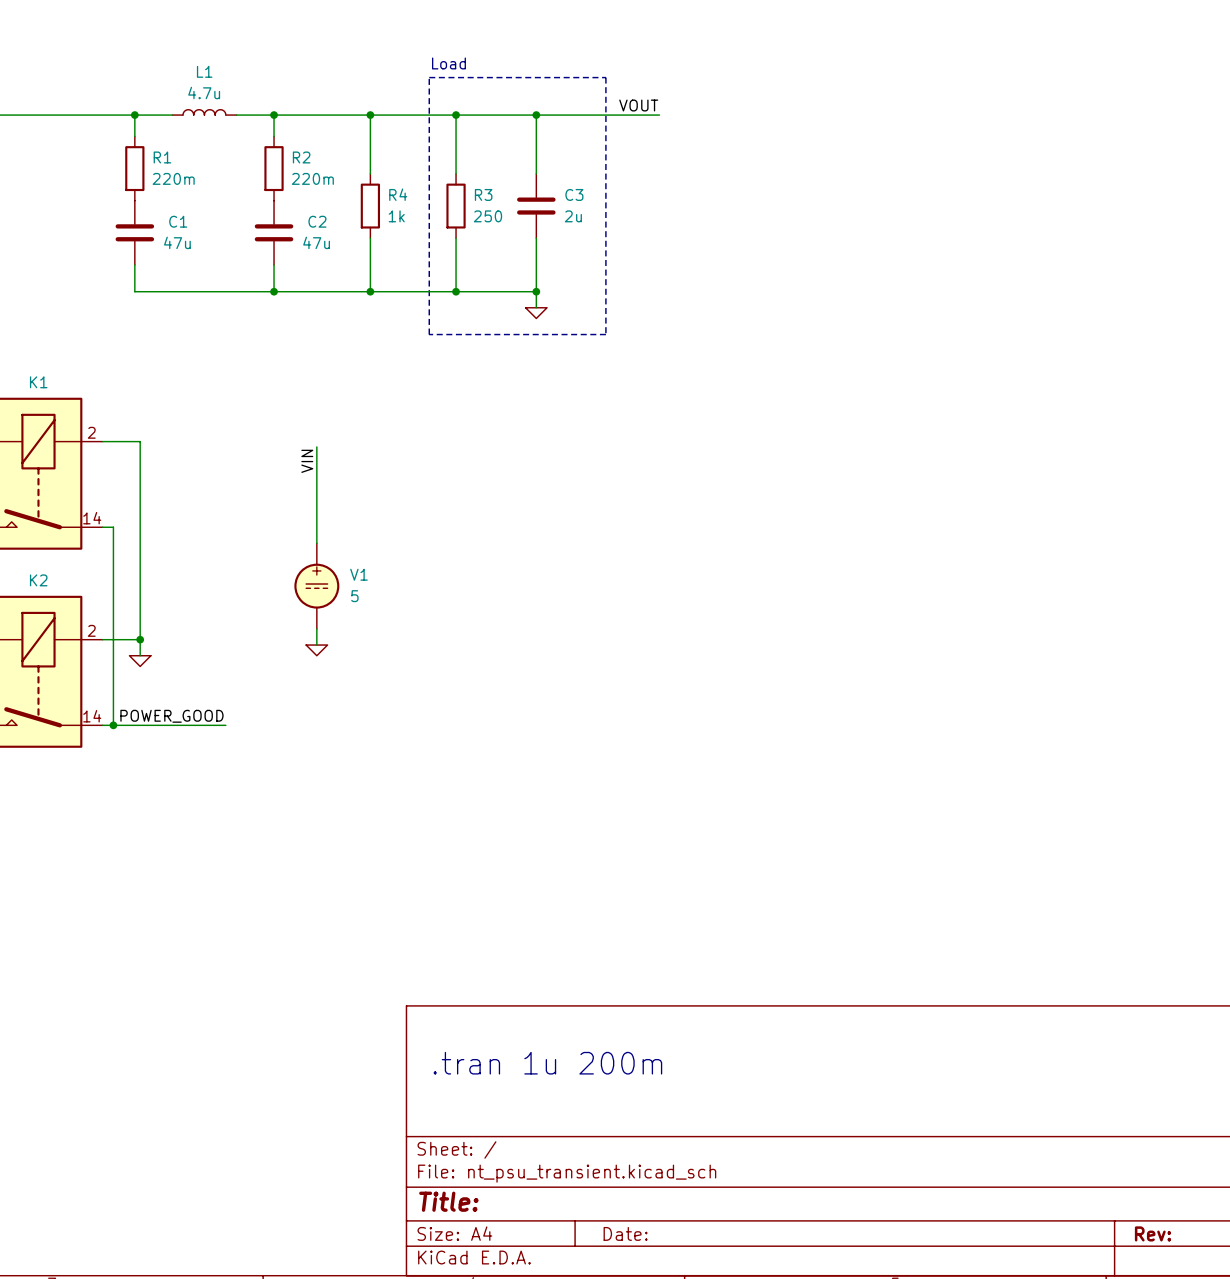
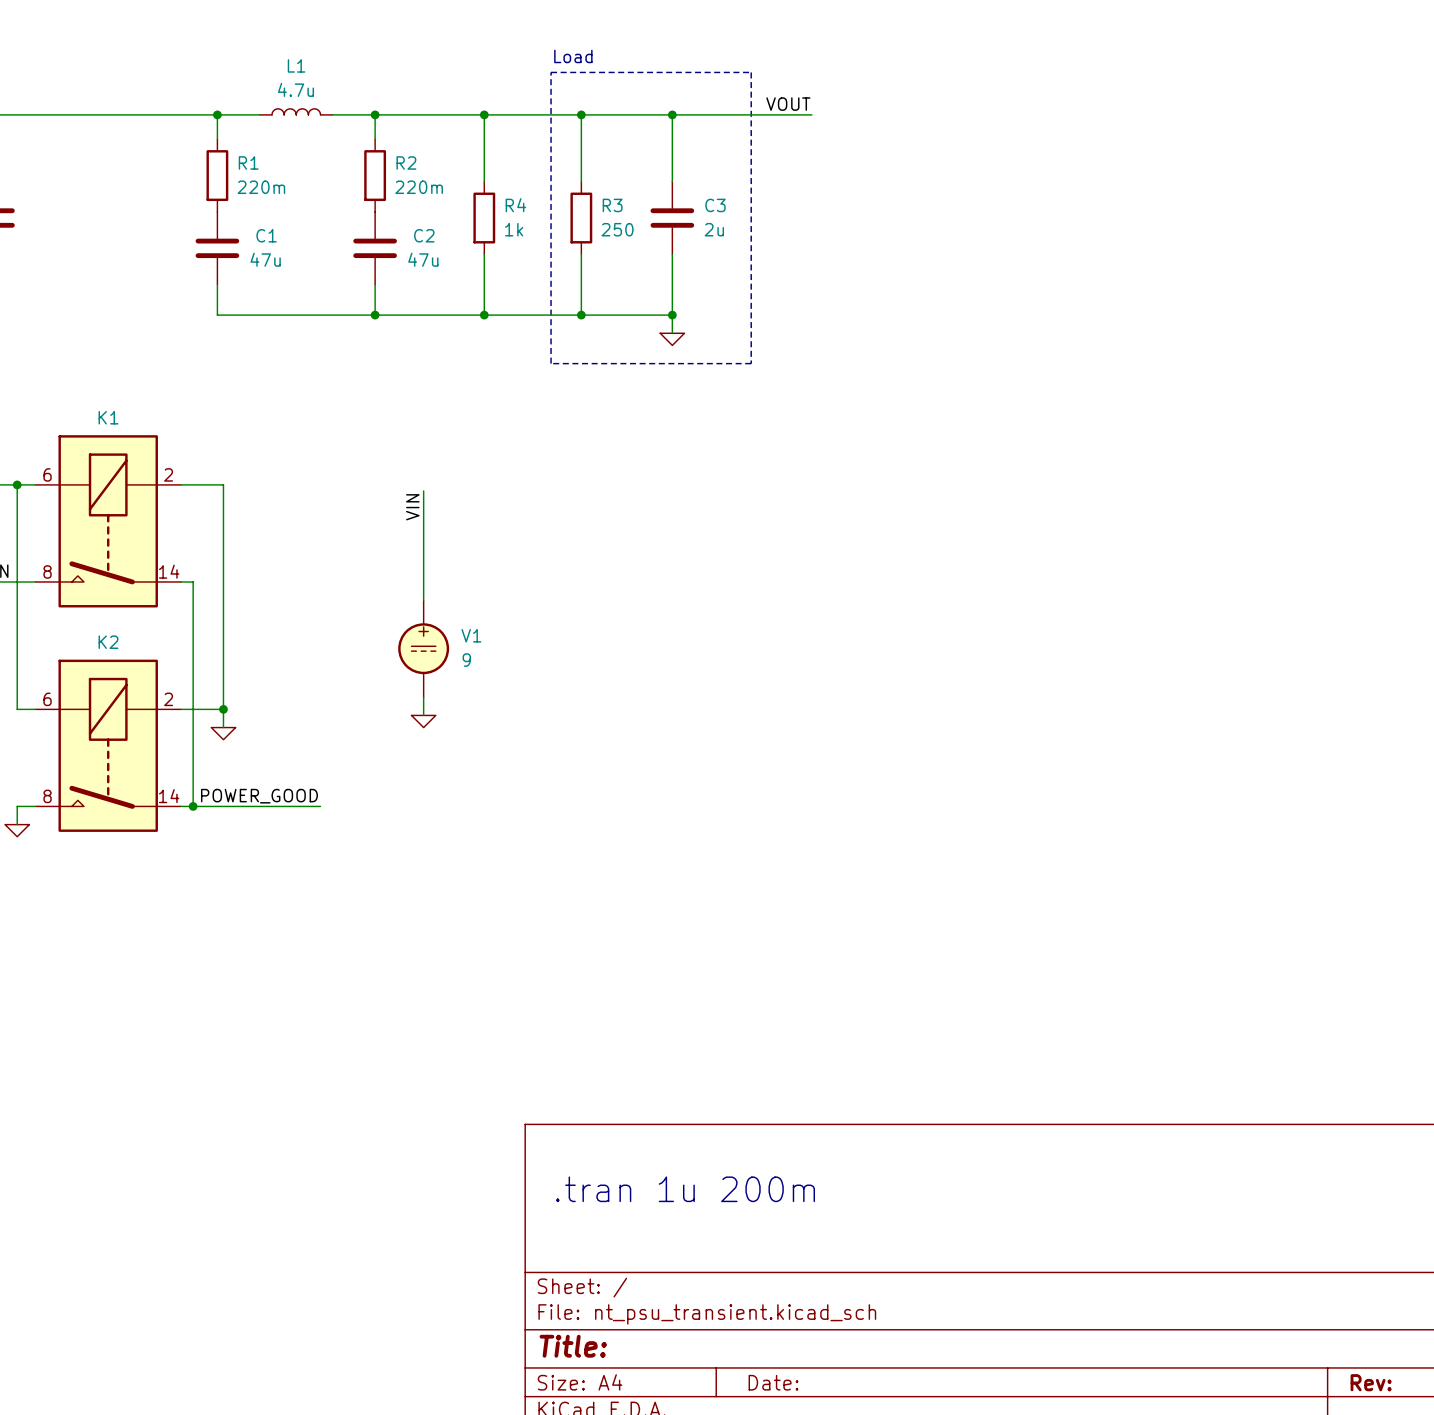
V1 value: 5 (354, 596) -> 9 (466, 660)

